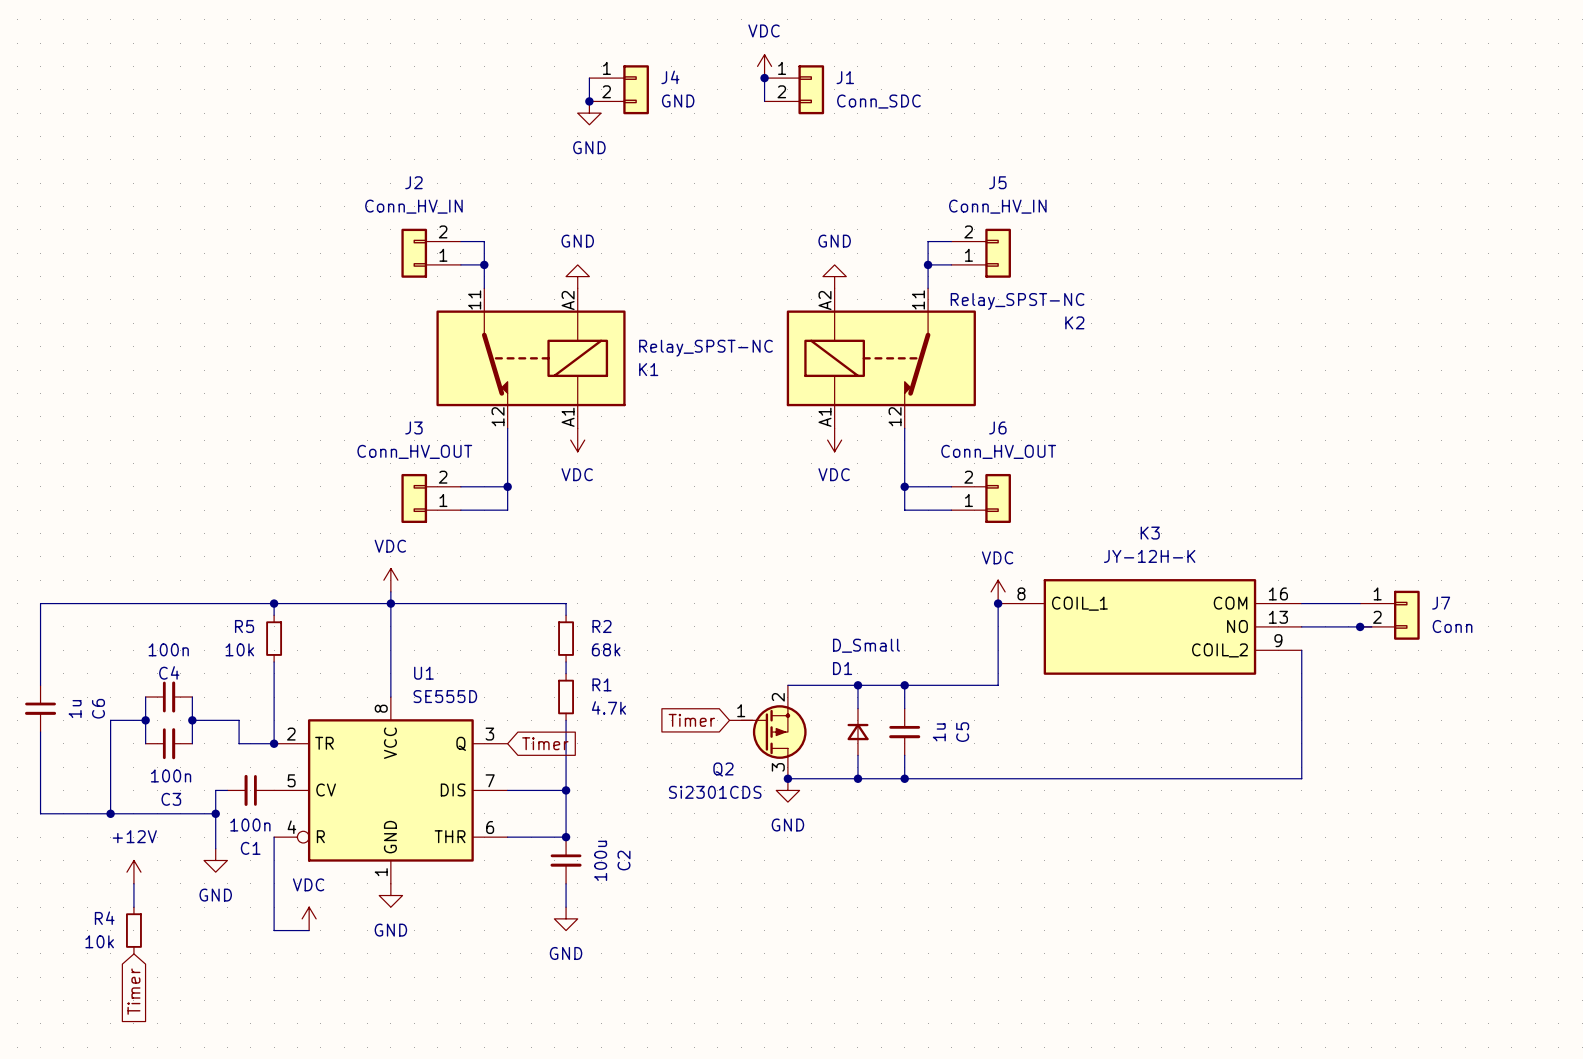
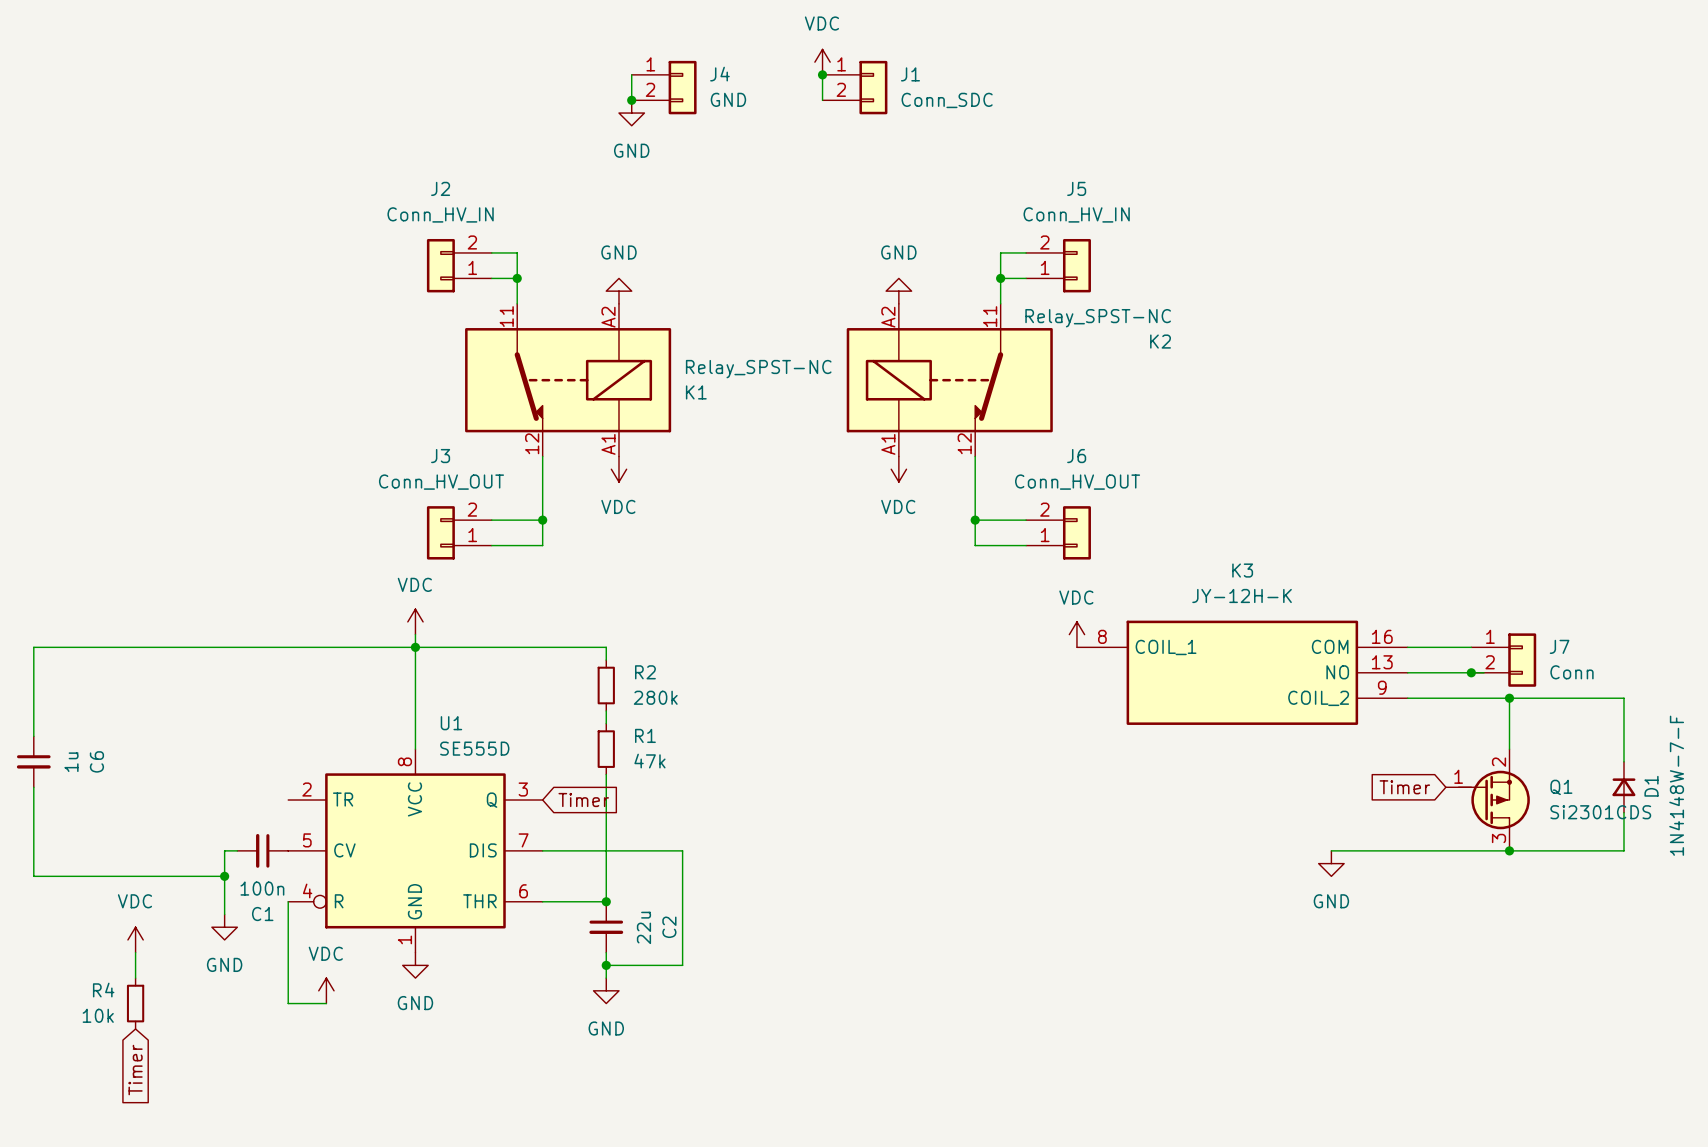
wire: (274, 603) (274, 615) -> none
junction: (274, 603) -> none
wire: (998, 603) (998, 685) (787, 685) -> none
junction: (998, 603) -> none
R5: 10k (274, 638) -> none
D1 value: D_Small (866, 645) -> 1N4148W-7-F (1676, 785)
R2 value: 68k (606, 649) -> 280k (655, 697)
wire: (1301, 650) (1301, 778) (787, 778) -> (1407, 698) (1623, 698) (1623, 761)
wire: none -> (1509, 698) (1509, 749)
junction: none -> (1509, 698)
wire: (274, 661) (274, 743) (239, 743) (239, 720) (192, 720) -> none
D1 name rotation: 0° (842, 668) -> 90° counterclockwise (1651, 786)
D1 name position: D1 (842, 668) -> D1 (1651, 786)
wire: (857, 685) (857, 708) -> none
junction: (857, 685) -> none
wire: (904, 685) (904, 708) -> none
junction: (904, 685) -> none
wire: (145, 697) (145, 743) -> none
C4: 100n (168, 697) -> none
wire: (192, 697) (192, 743) -> none
R1 value: 4.7k (608, 707) -> 47k (649, 761)
wire: (145, 720) (110, 720) (110, 813) -> none
junction: (145, 720) -> none
junction: (192, 720) -> none
global label: Timer (691, 720) -> none
Q2: Si2301CDS (768, 732) -> none
D1 position: (857, 732) -> (1623, 787)
C5: 1u (904, 732) -> none
global label: none -> Timer (1404, 787)
C3: 100n (168, 743) -> none
junction: (274, 743) -> none
Q1: none -> Si2301CDS (1487, 800)
wire: (857, 755) (857, 778) -> none
wire: (904, 755) (904, 778) -> none
wire: none -> (1623, 812) (1623, 850) (1331, 850)
junction: (787, 778) -> none
junction: (857, 778) -> none
junction: (904, 778) -> none
wire: none -> (606, 850) (682, 850) (682, 965) (606, 965)
junction: (566, 790) -> none
power symbol: GND (787, 790) -> none
junction: none -> (1509, 850)
power symbol: none -> GND (1331, 863)
junction: (110, 813) -> none
C2 value: 100u (600, 860) -> 22u (643, 927)
power symbol: +12V (133, 872) -> VDC (135, 939)
junction: none -> (606, 965)

